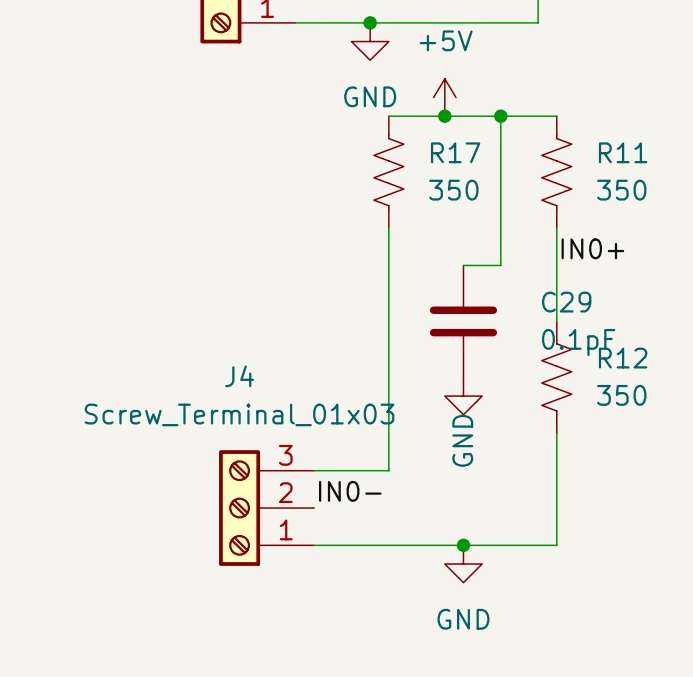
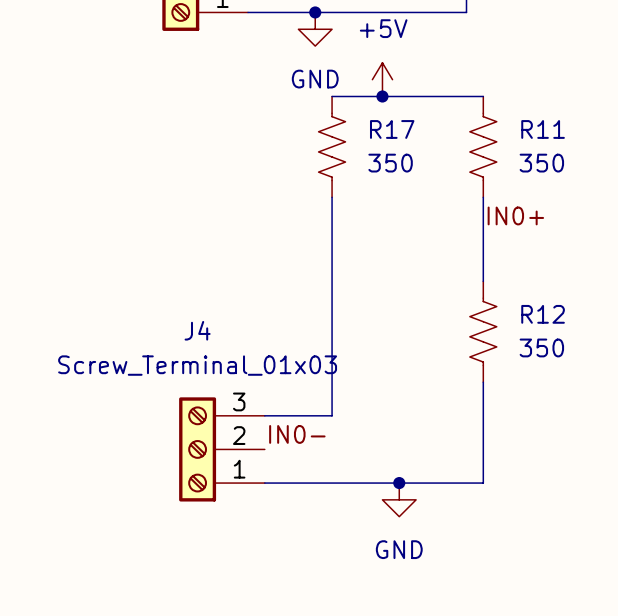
wire: (500, 116) (500, 265) (463, 265) -> none
junction: (500, 116) -> none
C29: 0.1pF (463, 321) -> none
power symbol: GND (463, 396) -> none

